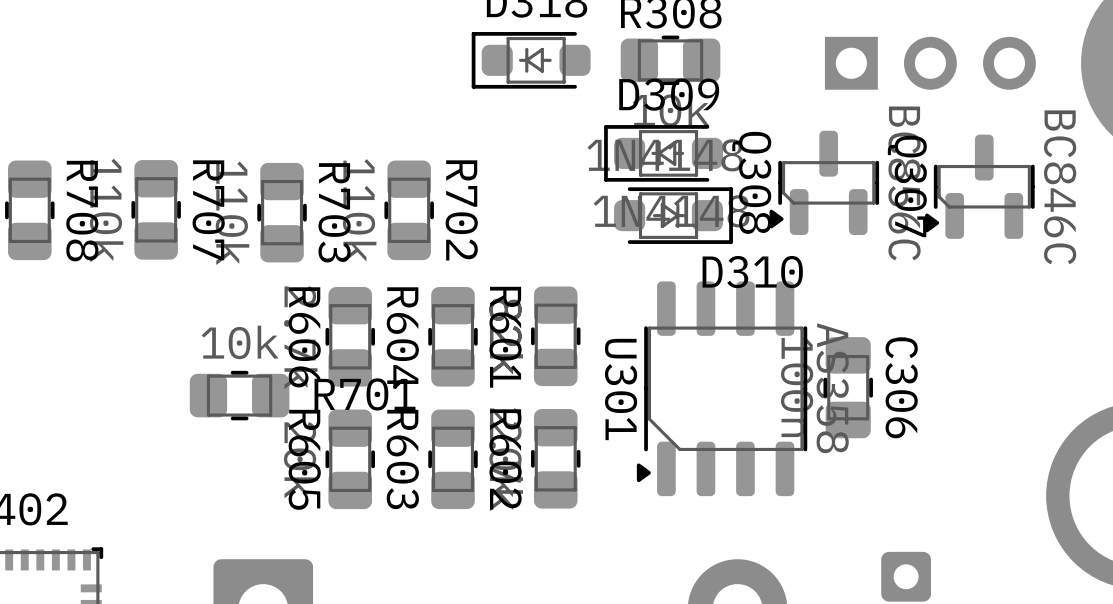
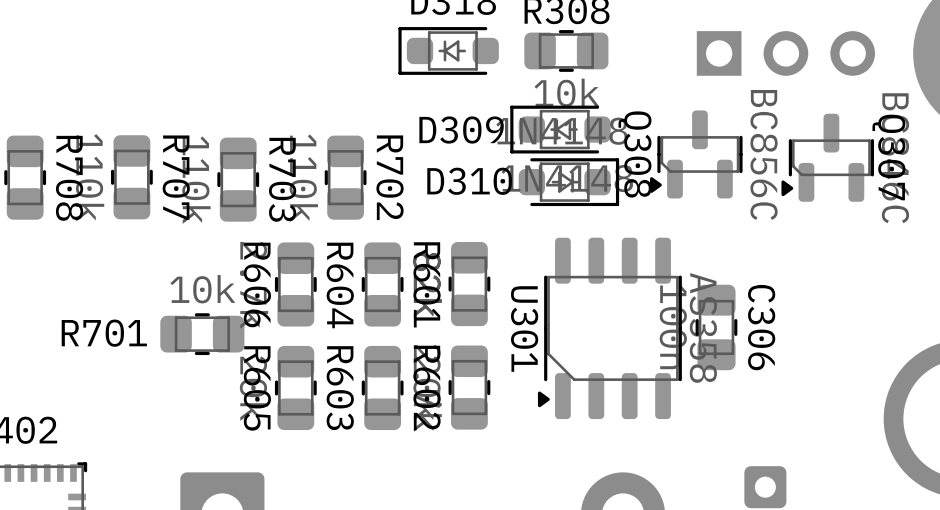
D309 name position: D309 (669, 94) -> D309 (461, 130)
Q307 name position: Q307 (907, 186) -> Q307 (888, 157)
D310 name position: D310 (752, 272) -> D310 (469, 181)
R701 name position: R701 (365, 394) -> R701 (104, 333)

